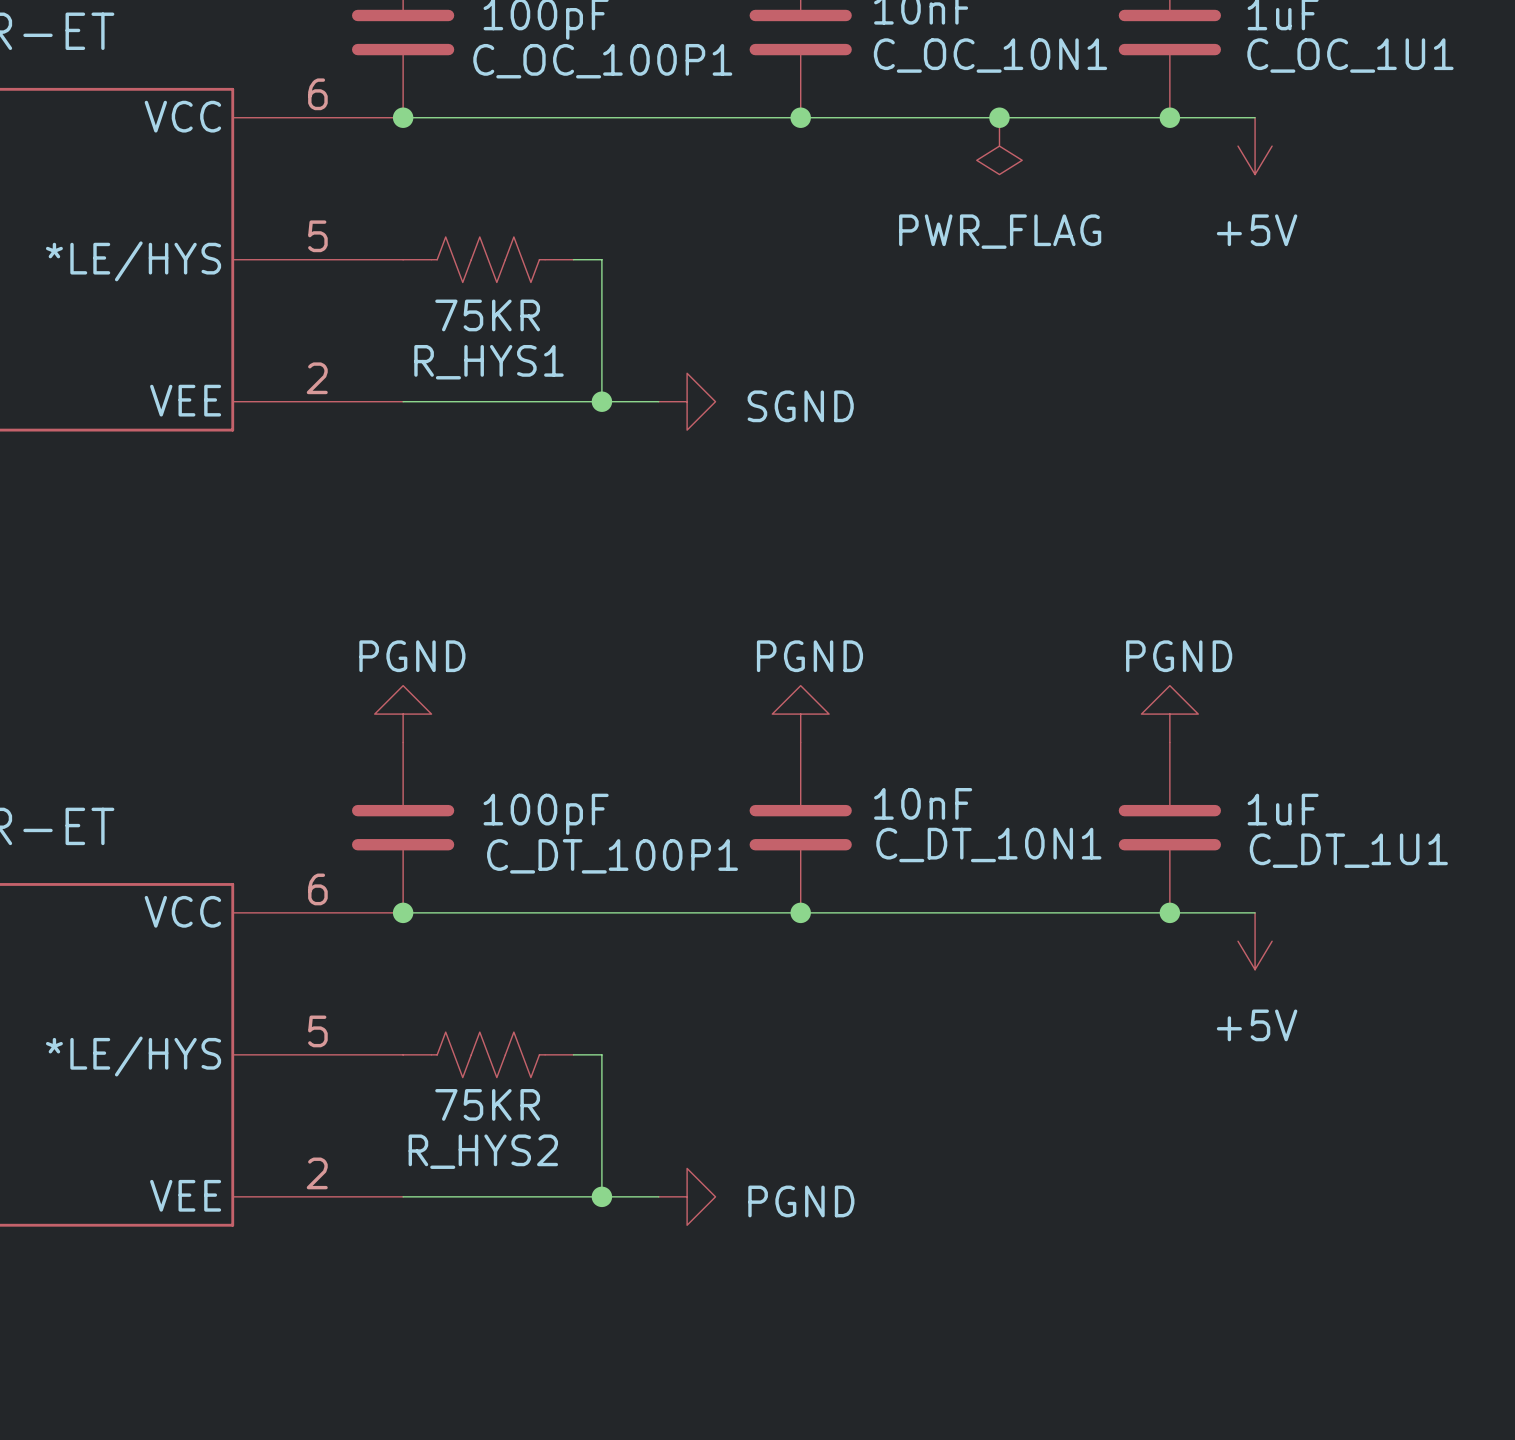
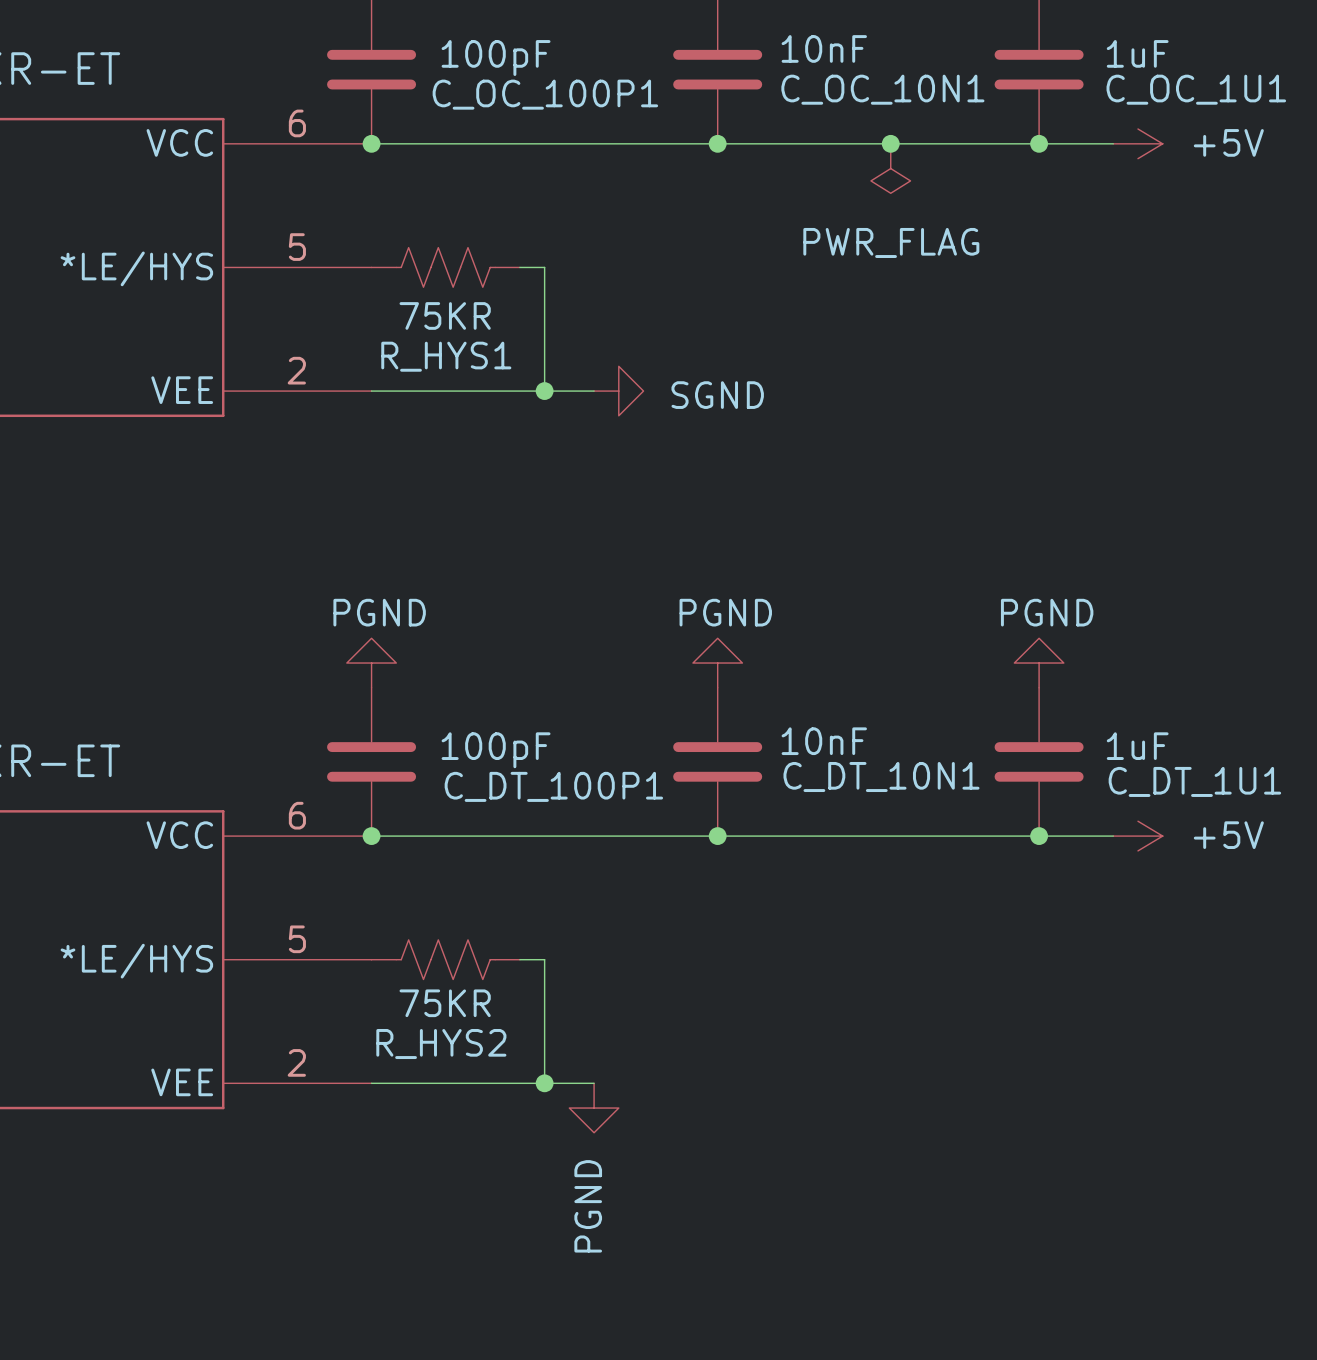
power symbol rotation: 0° (1255, 146) -> 90° counterclockwise (1137, 143)
power symbol position: +5V (1255, 146) -> +5V (1137, 143)
power symbol rotation: 0° (1255, 941) -> 90° counterclockwise (1137, 836)
power symbol position: +5V (1255, 941) -> +5V (1137, 836)
power symbol rotation: 0° (687, 1196) -> 90° clockwise (594, 1108)
power symbol position: PGND (687, 1196) -> PGND (594, 1108)

